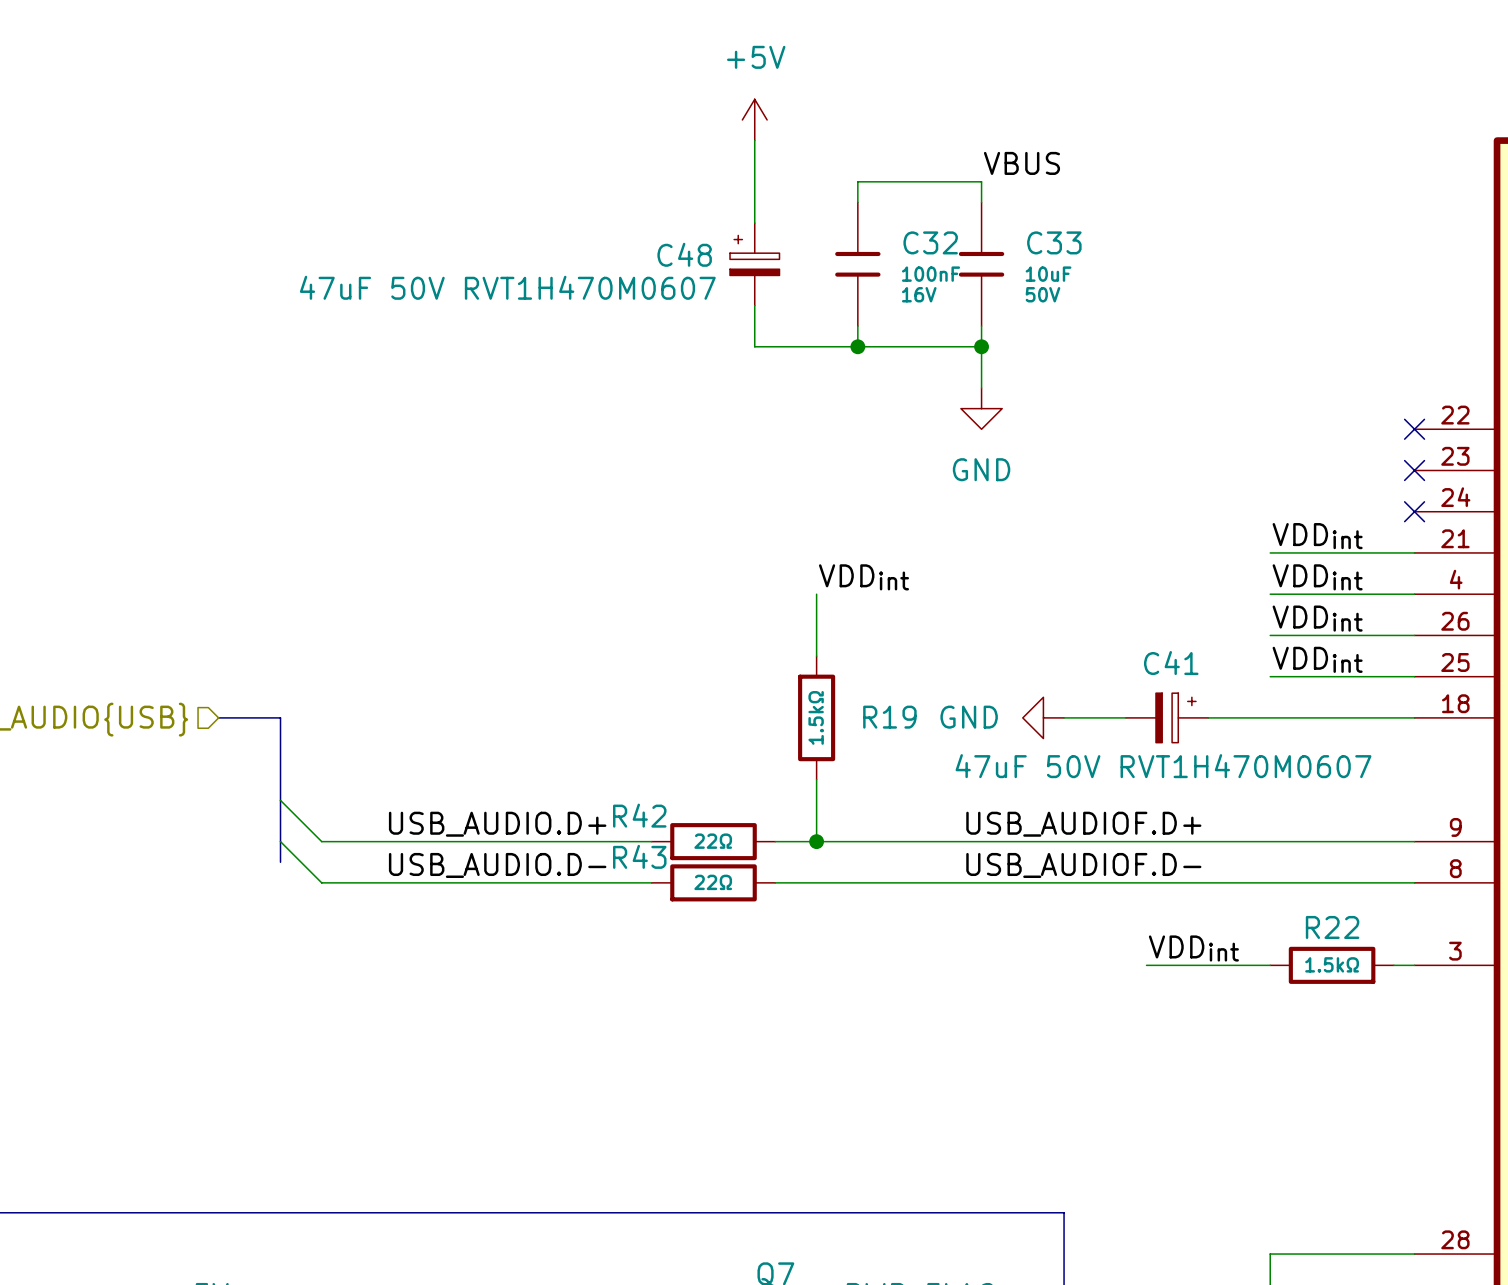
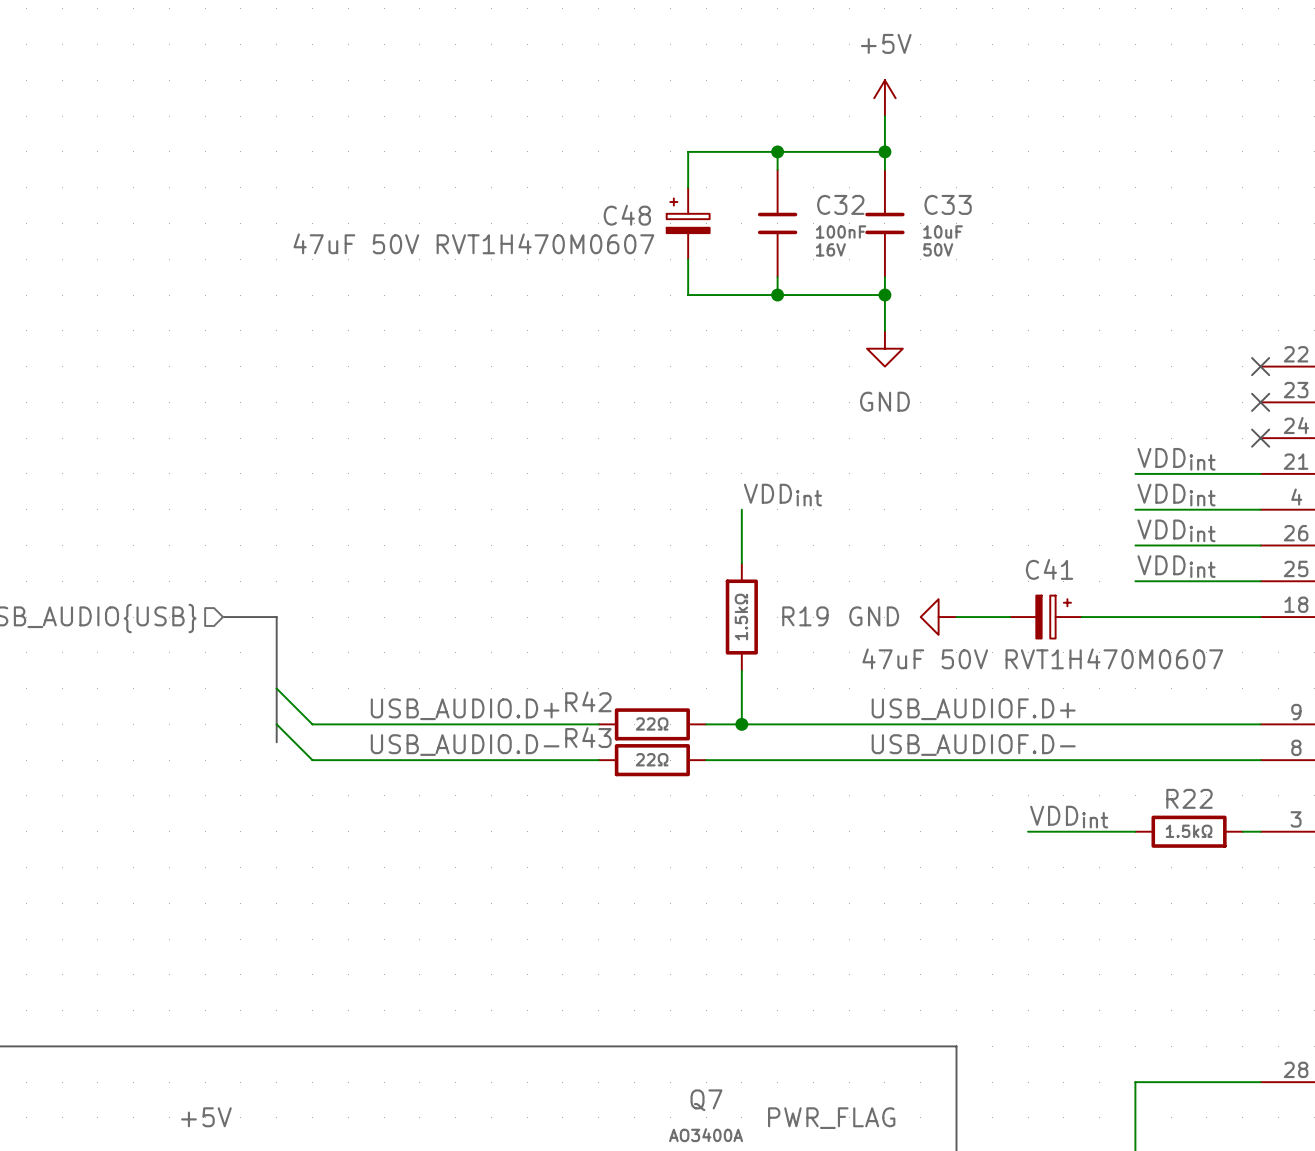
power symbol position: +5V (754, 119) -> +5V (884, 98)
wire: (754, 140) (754, 181) -> (777, 151) (688, 151)
wire: none -> (884, 116) (884, 151)
label: VBUS (1021, 163) -> none
junction: none -> (777, 151)
junction: none -> (884, 151)

